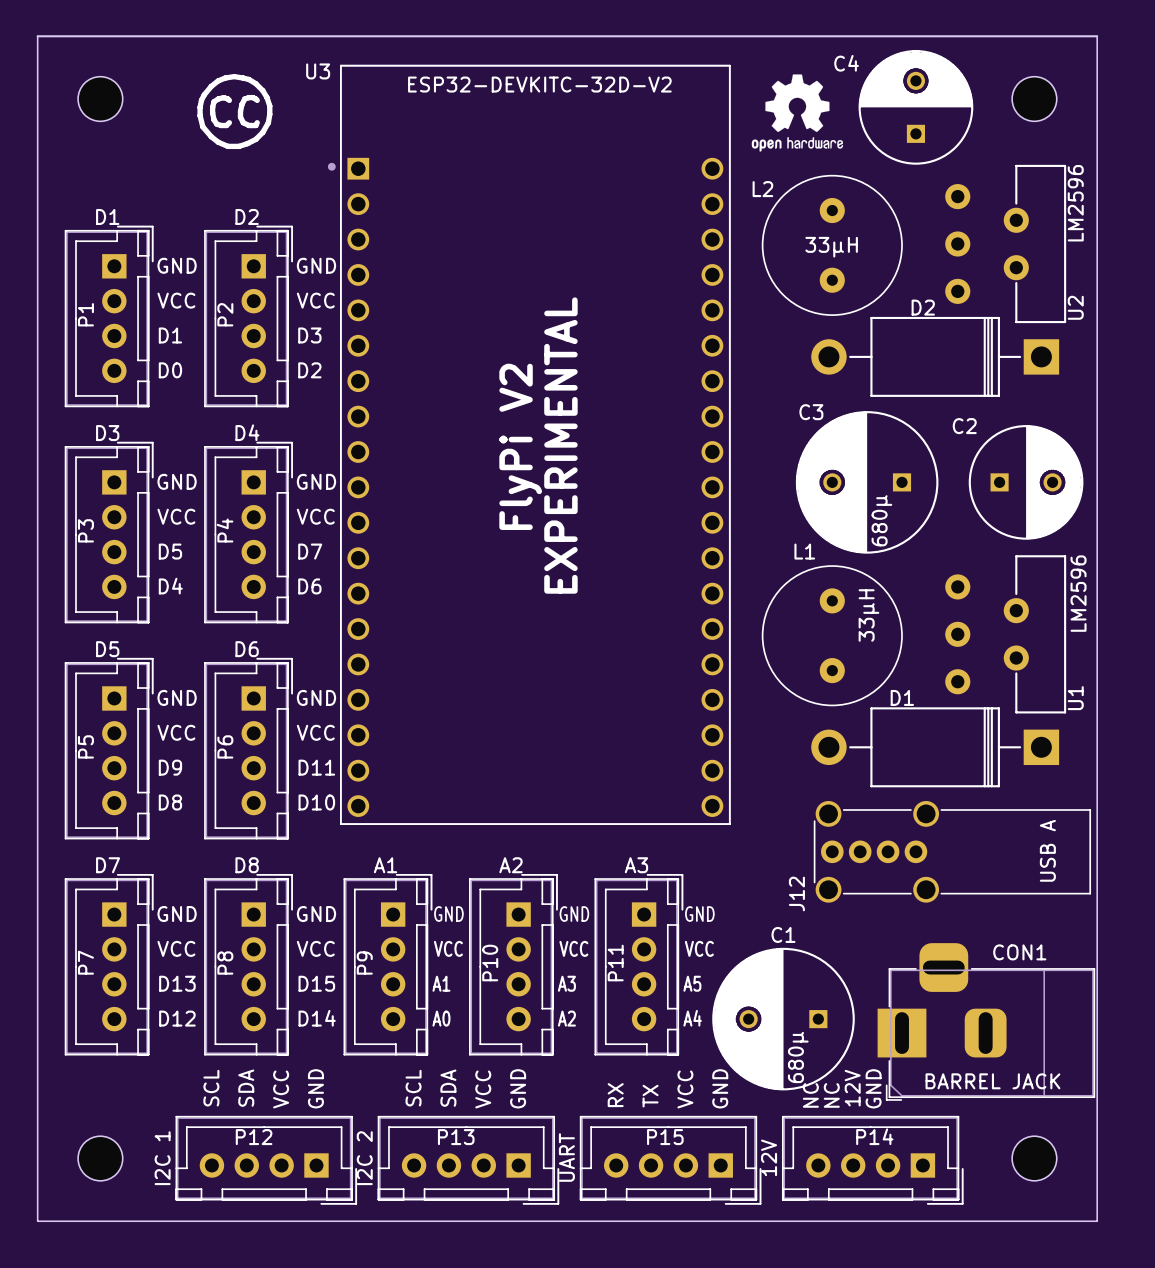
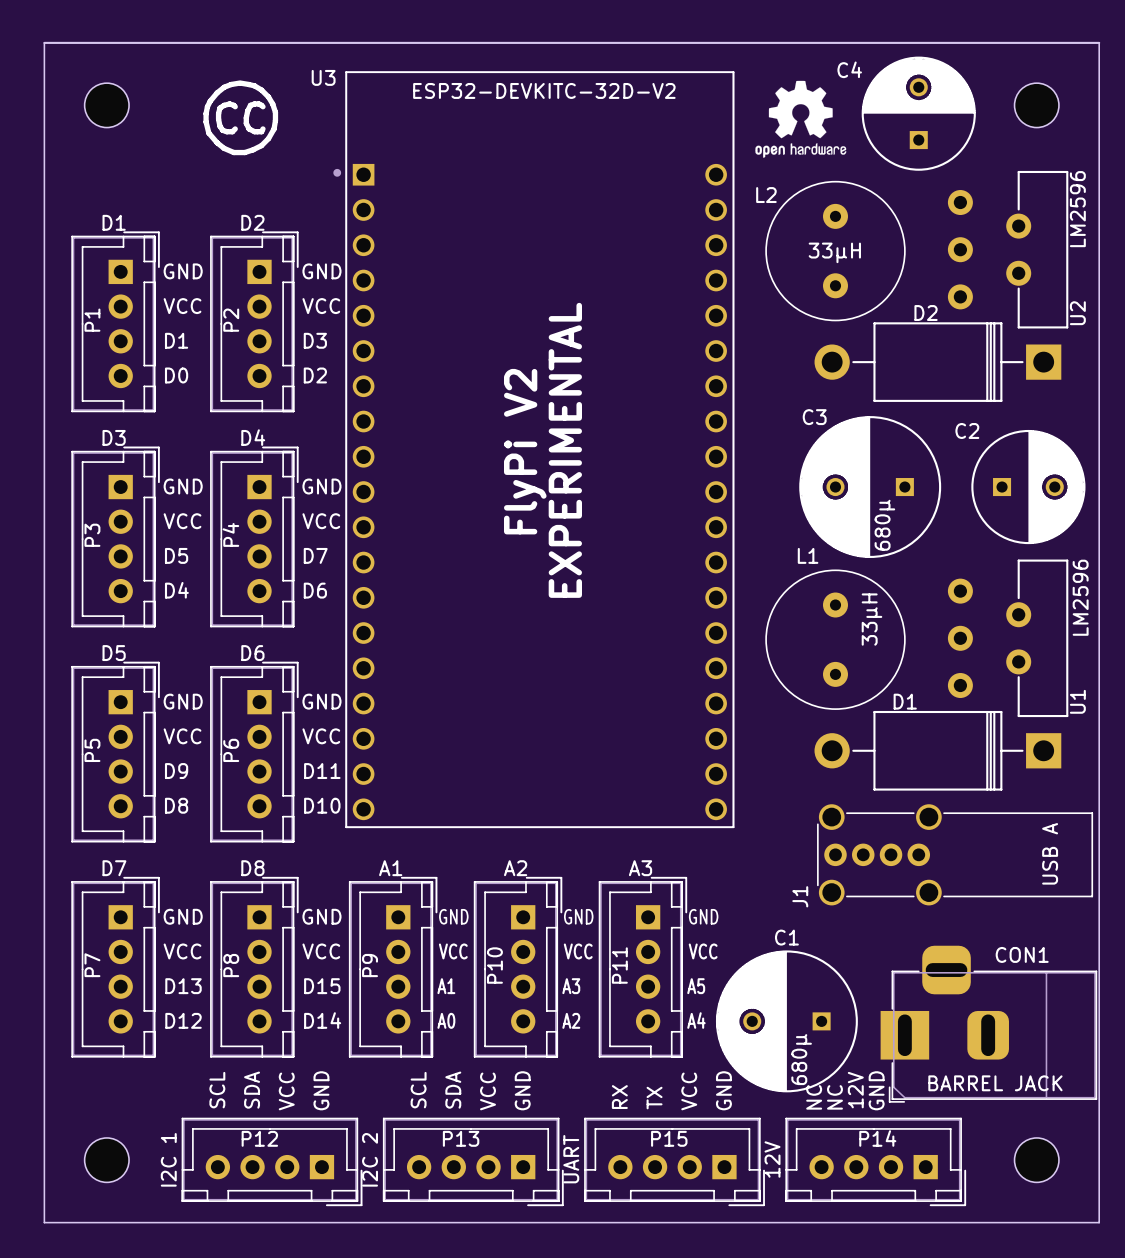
J12 name: J12 (796, 893) -> J1 (800, 896)

